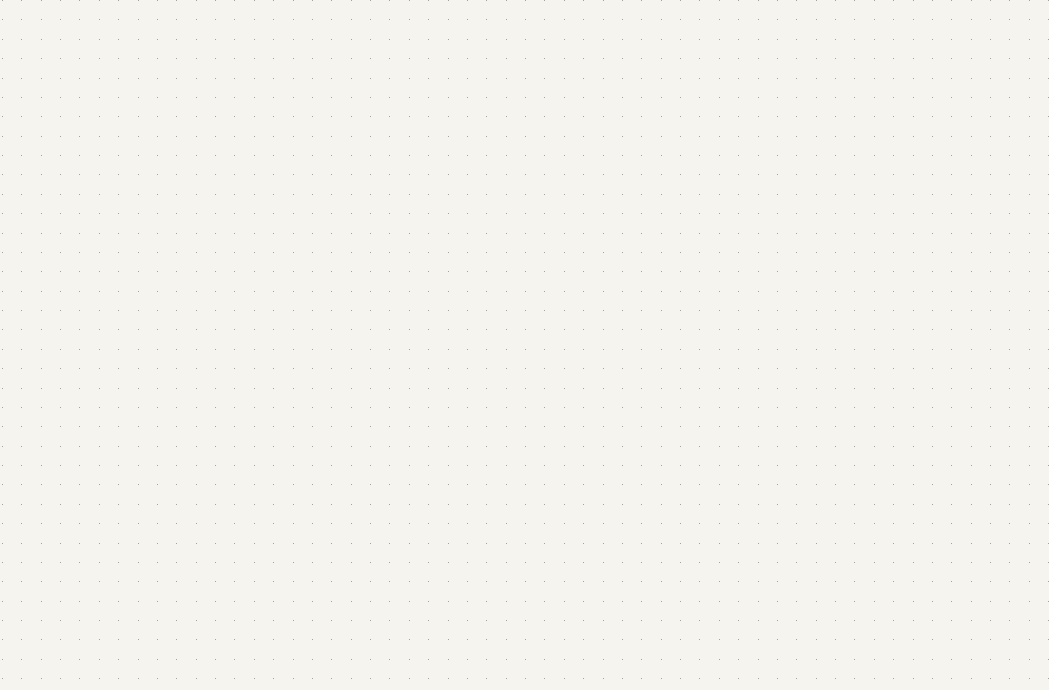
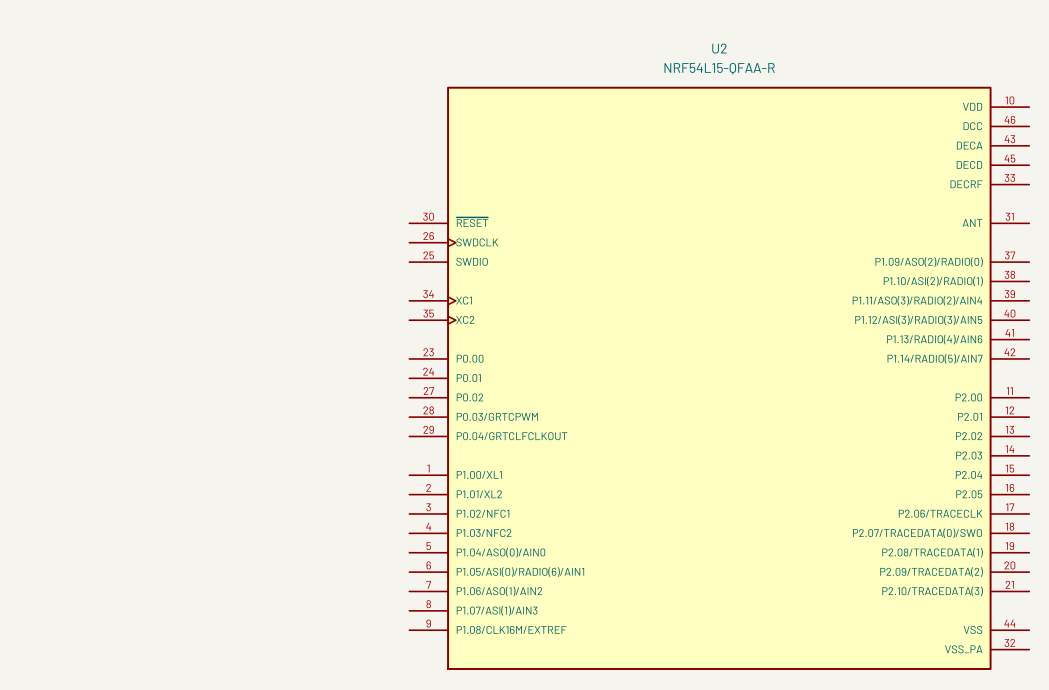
U2: none -> NRF54L15-QFAA-R (719, 378)

